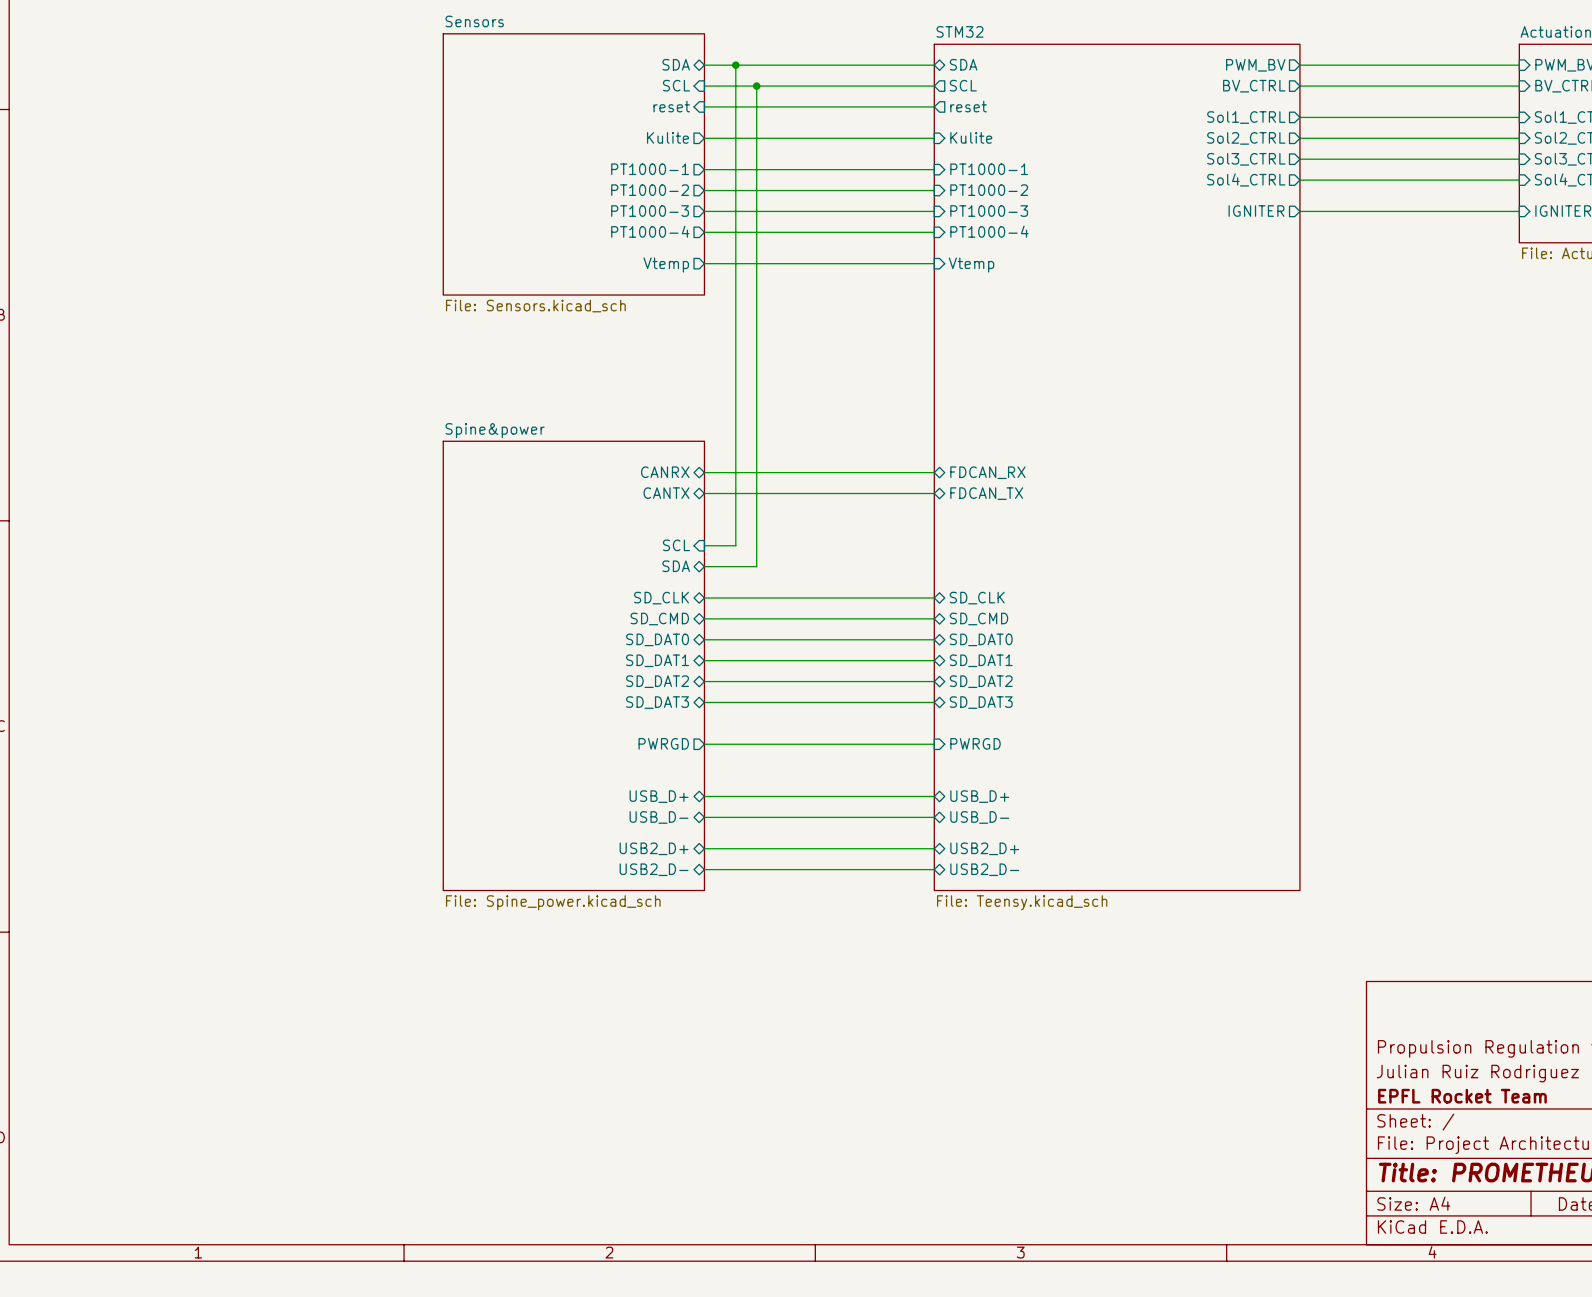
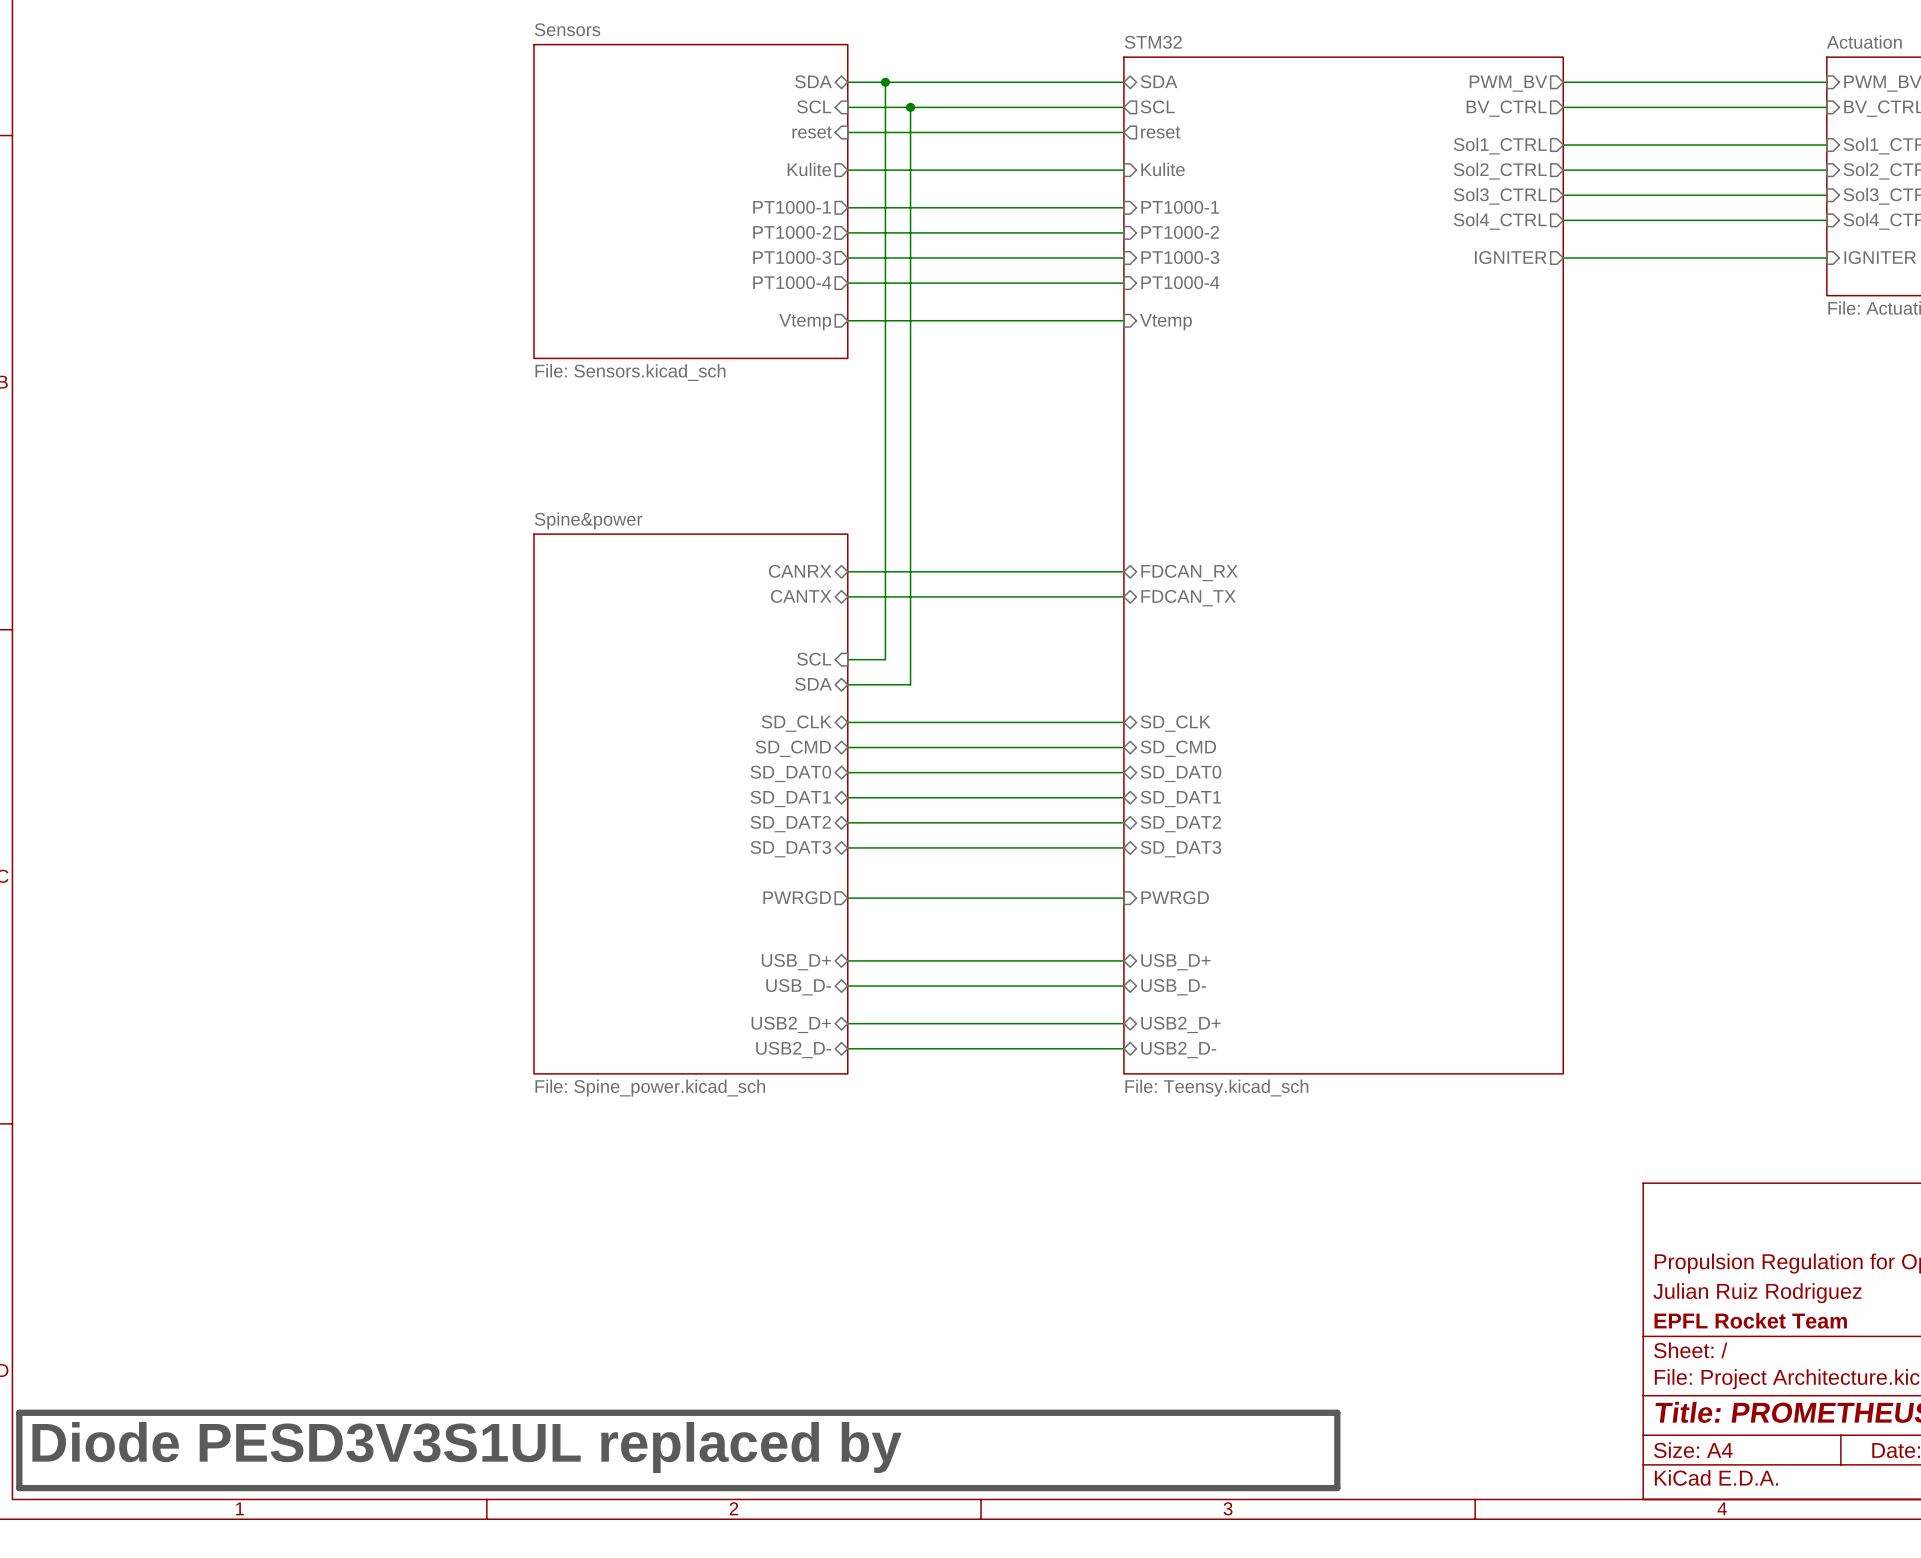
line: none -> (19, 1412) (1337, 1412) (1337, 1488) (19, 1488) (19, 1412)
text: none -> Diode PESD3V3S1UL replaced by (466, 1447)

